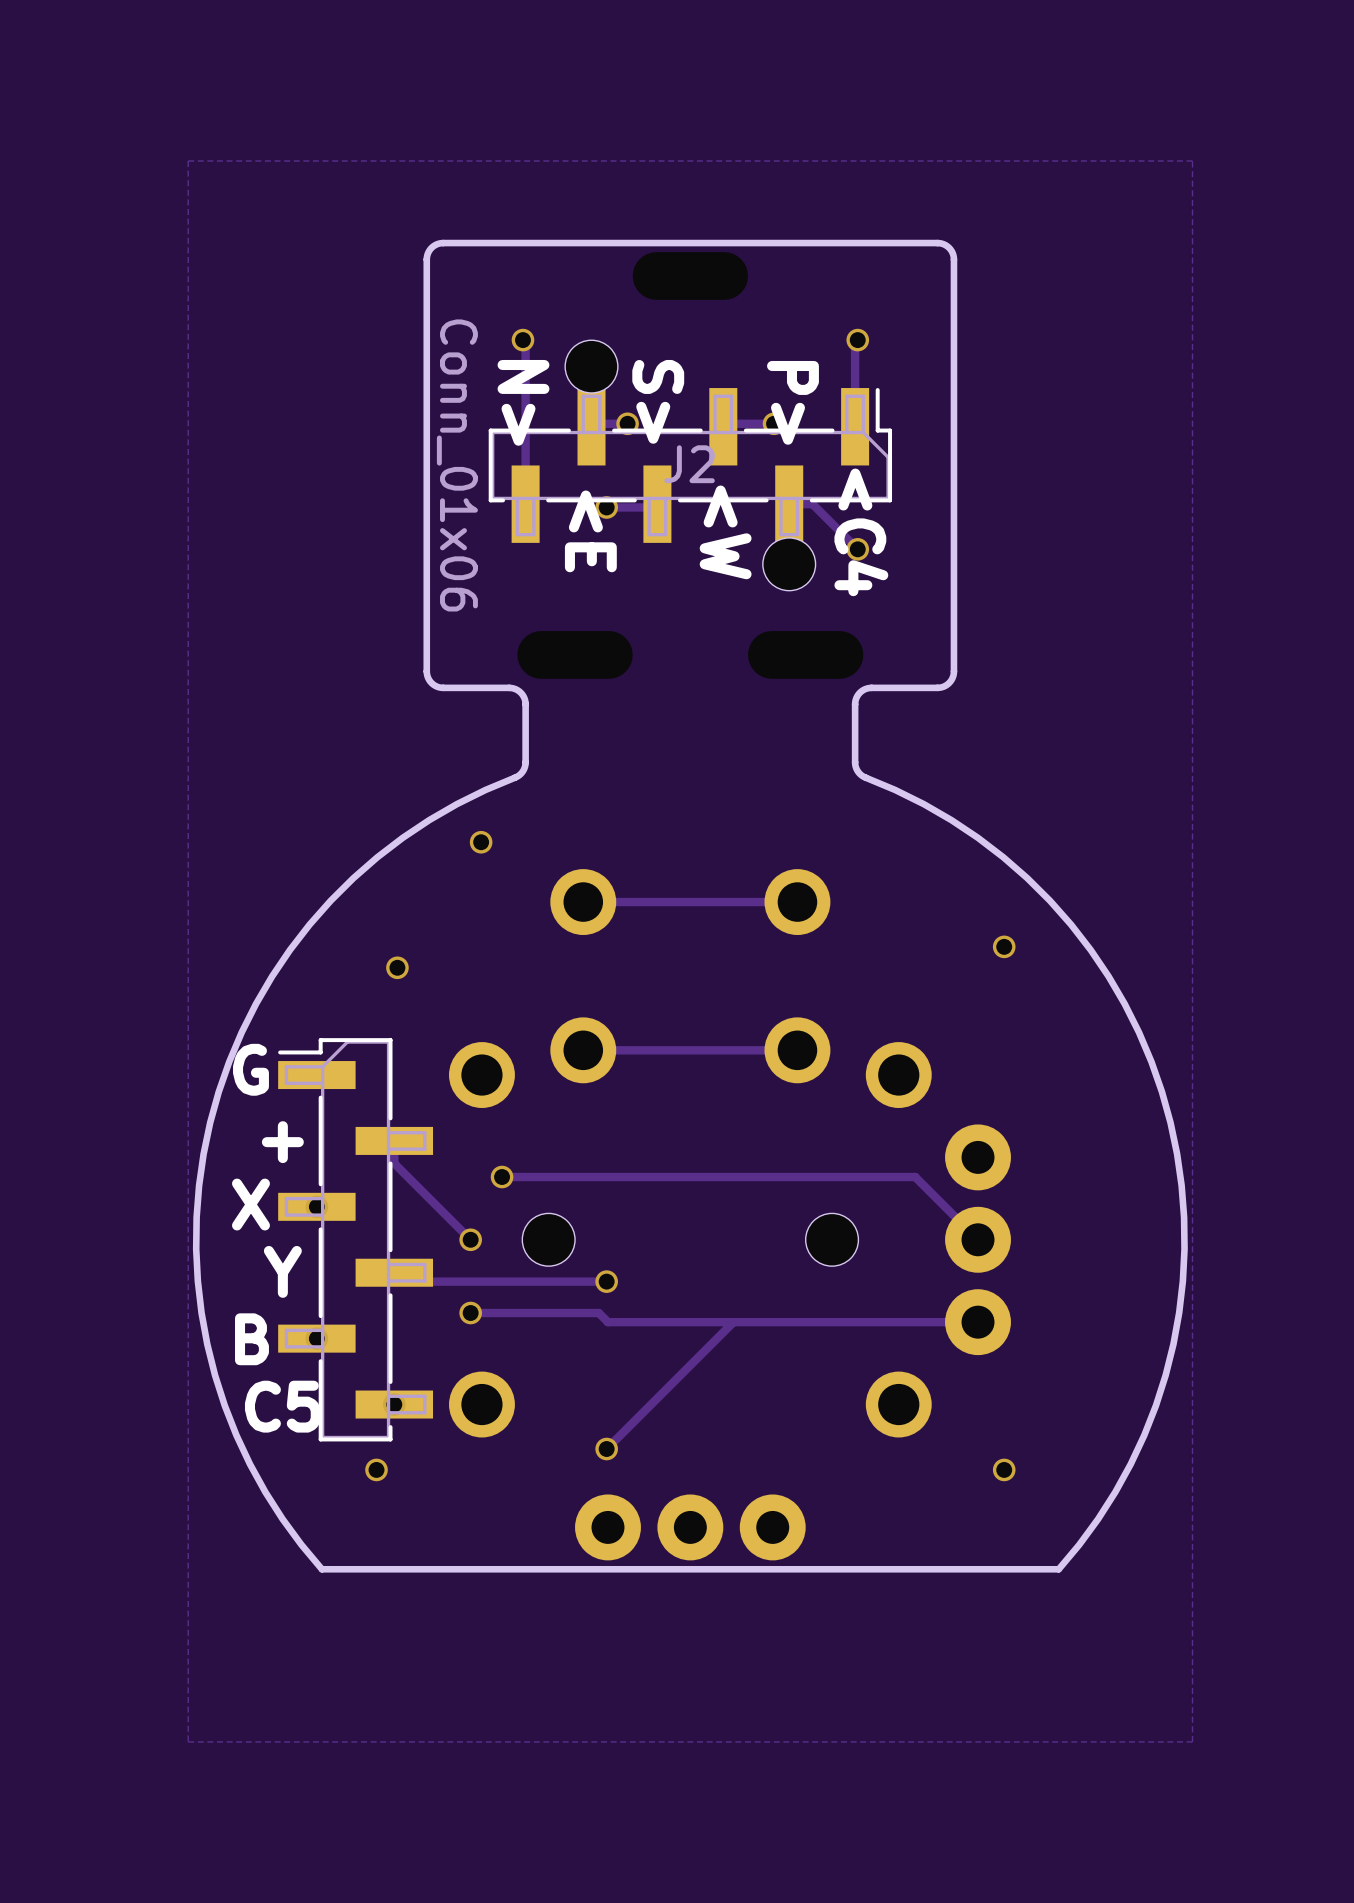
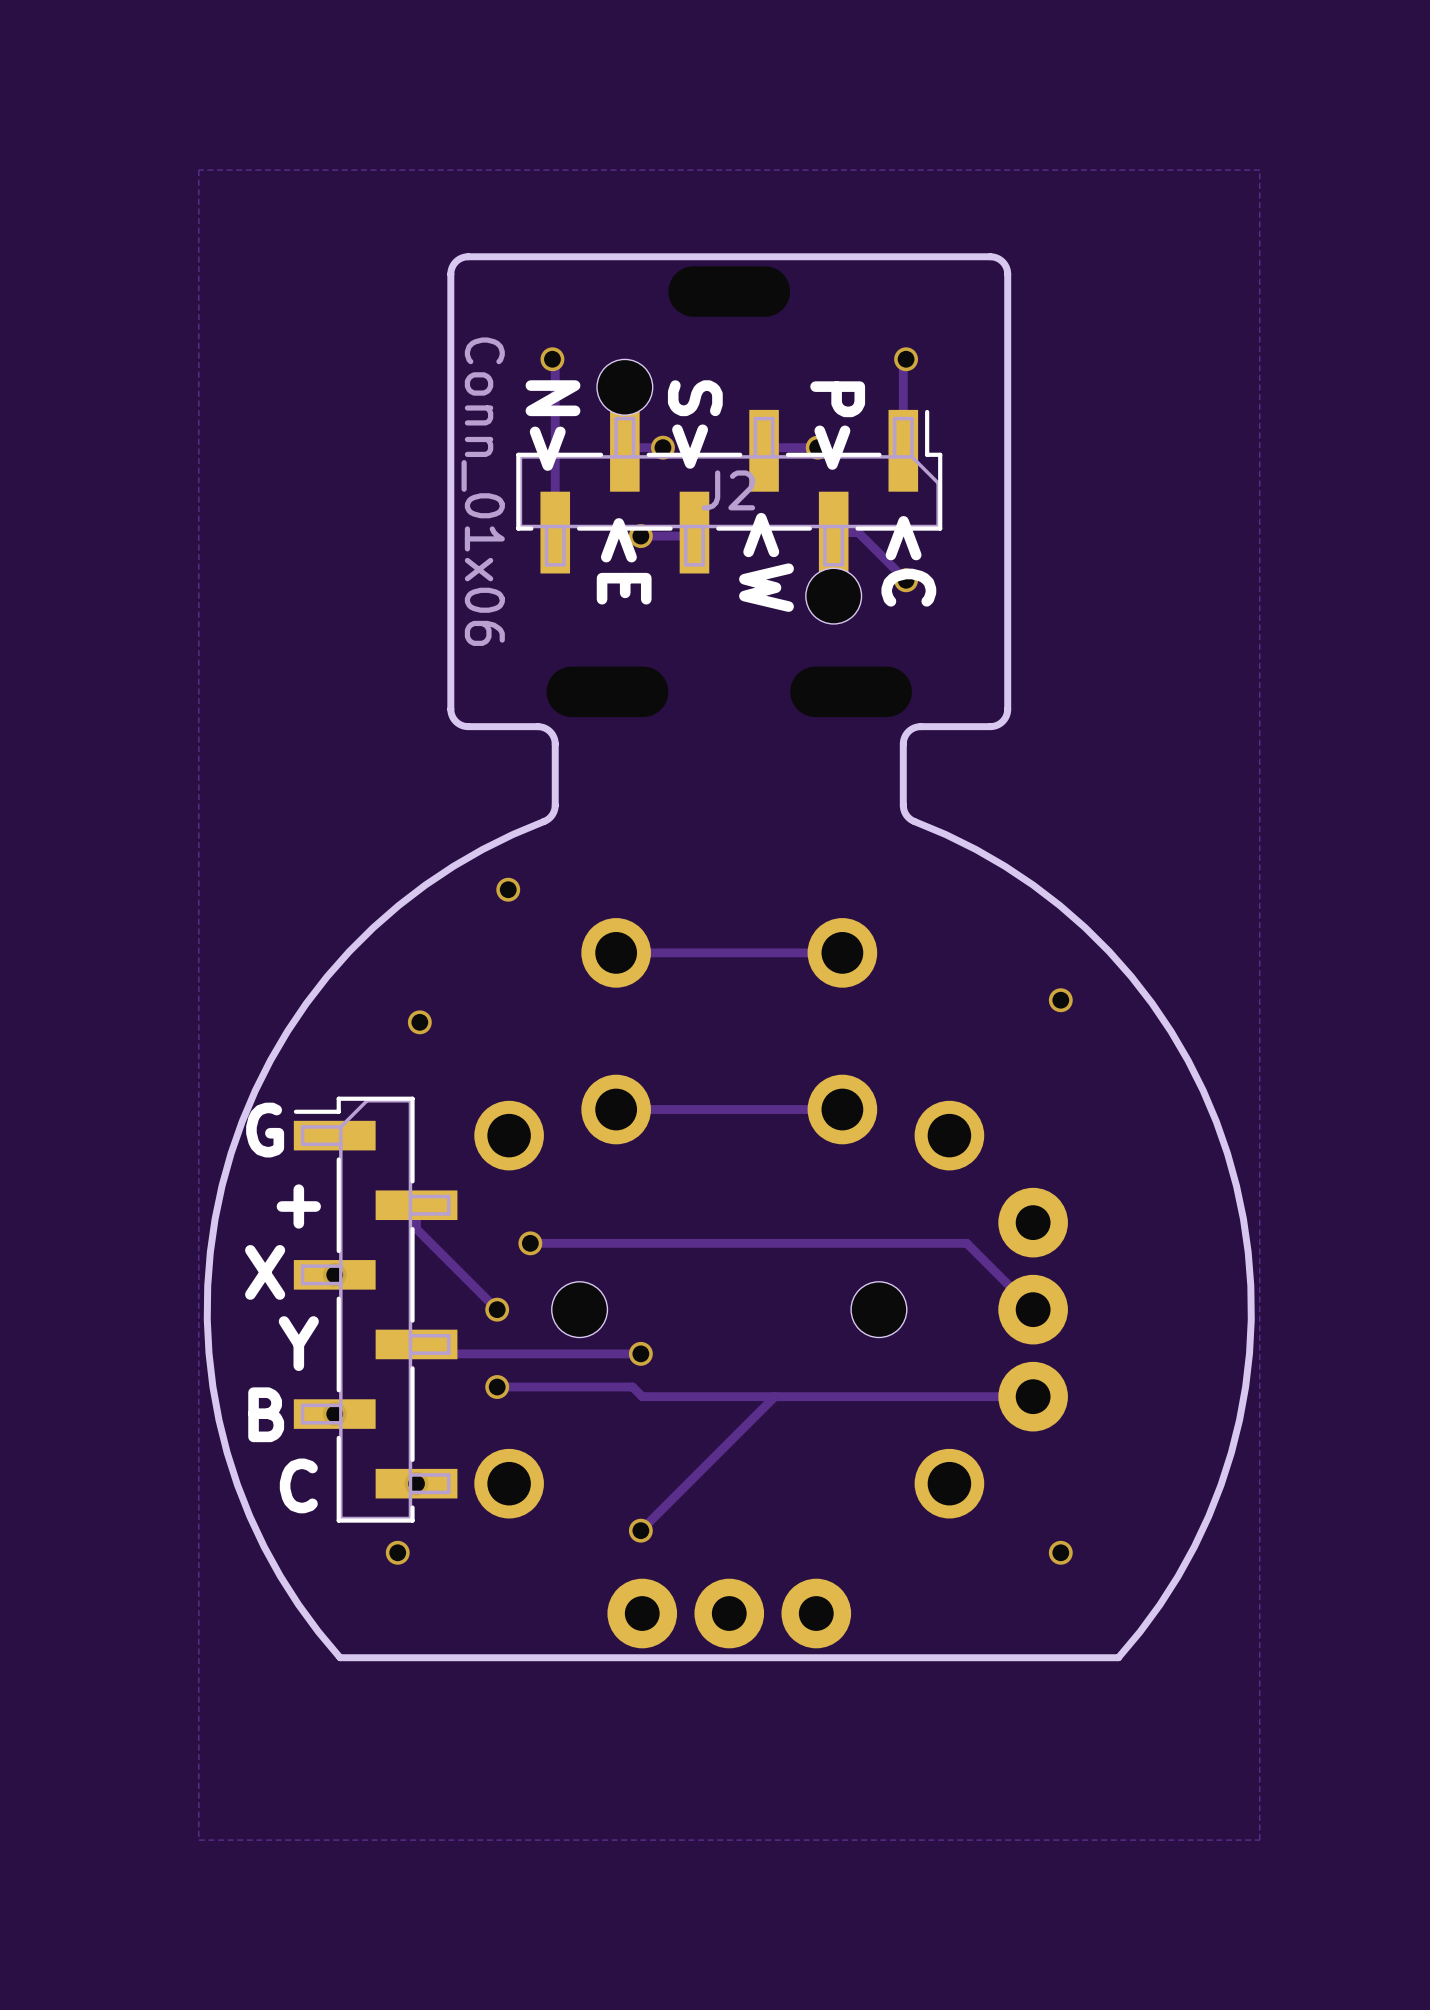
text: <C4 (861, 532) -> <C (908, 561)
text: C5 (282, 1406) -> C (298, 1485)

